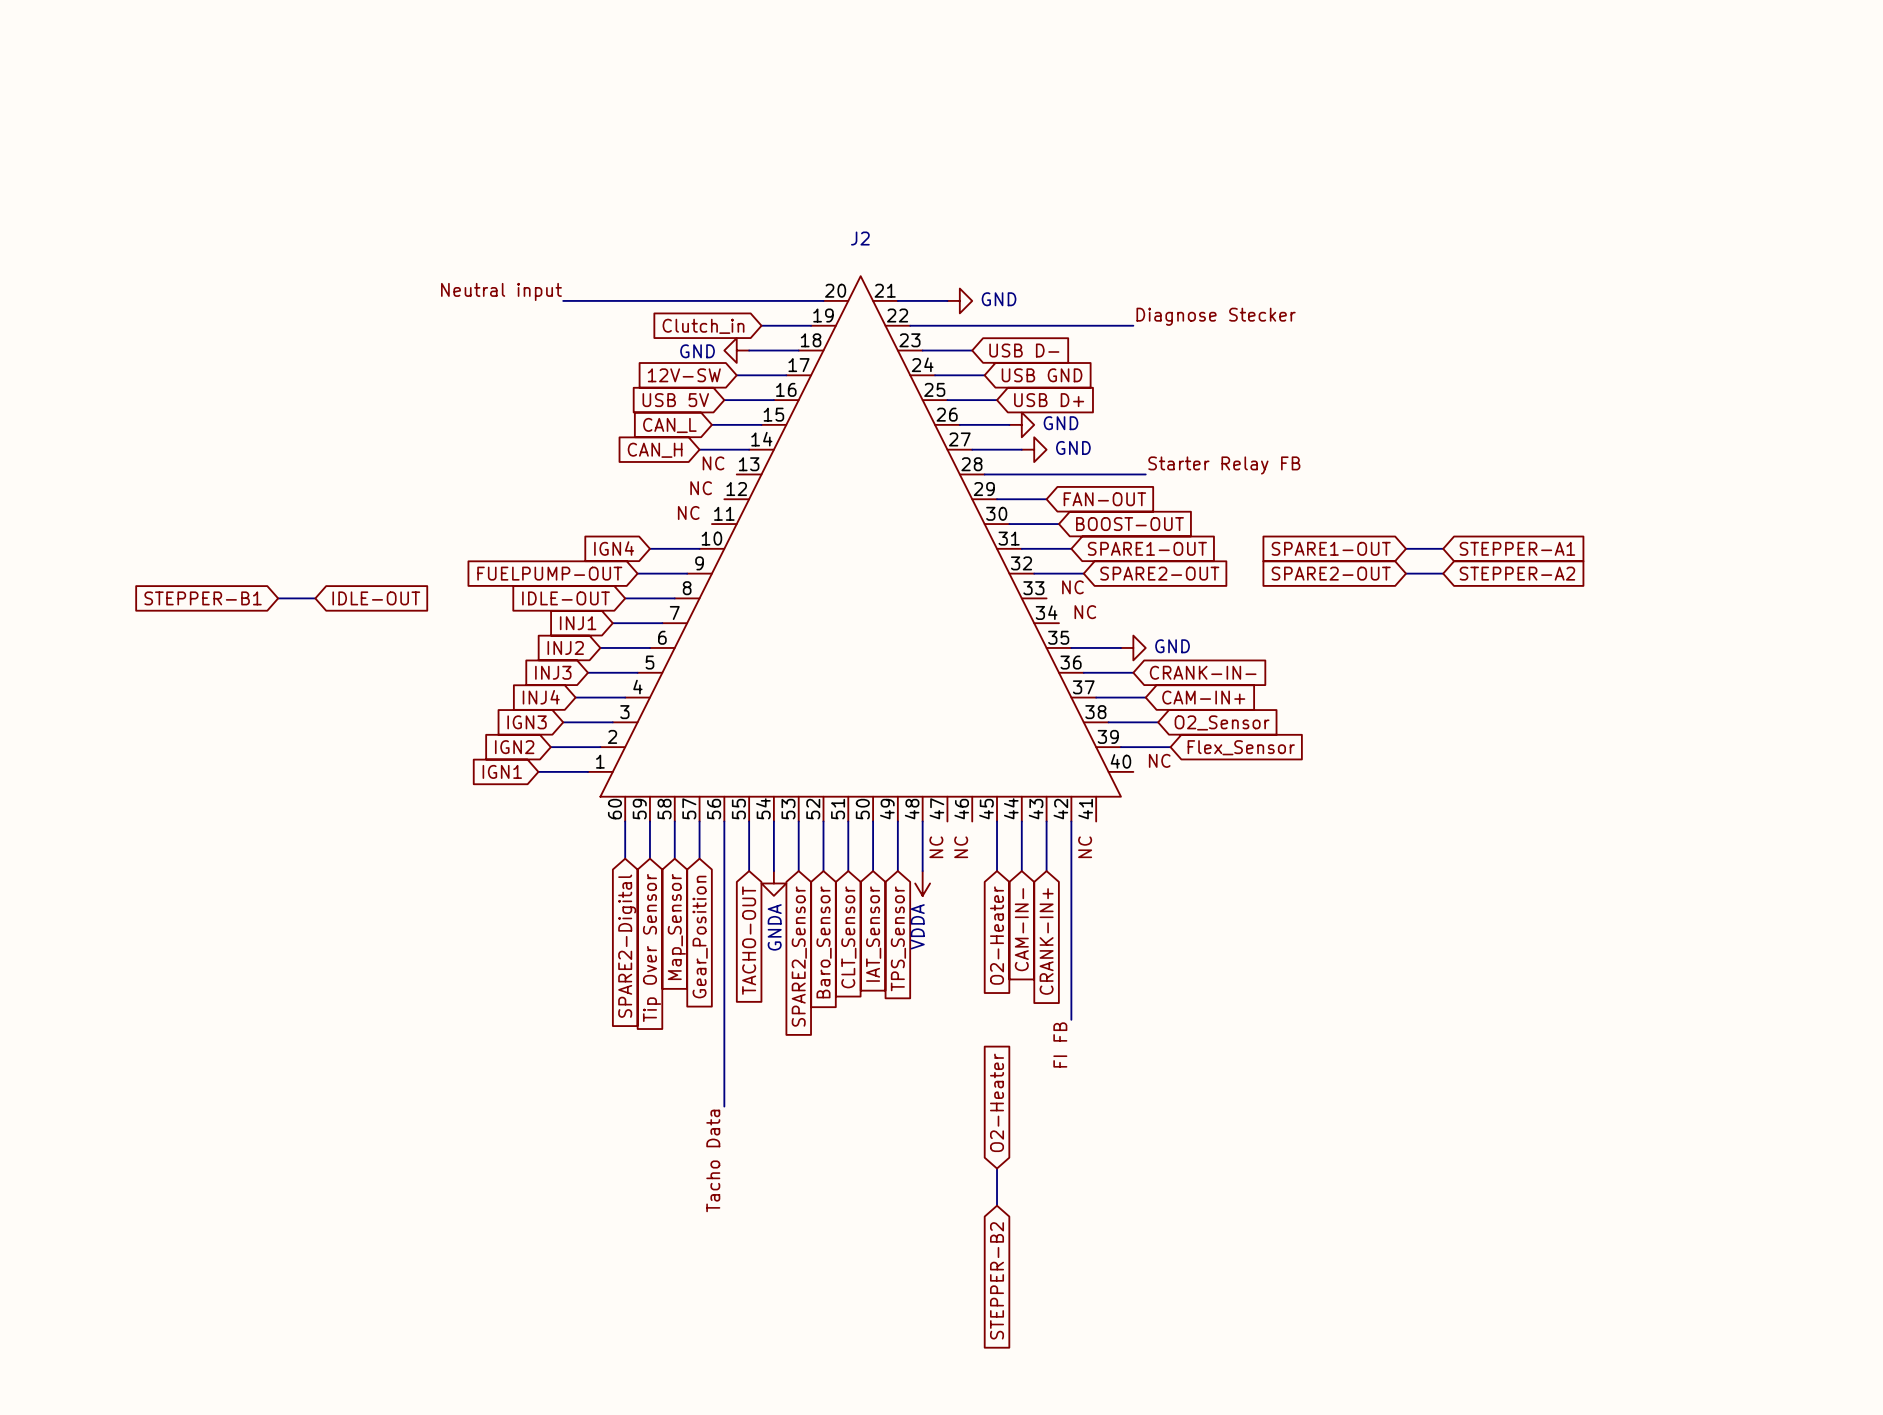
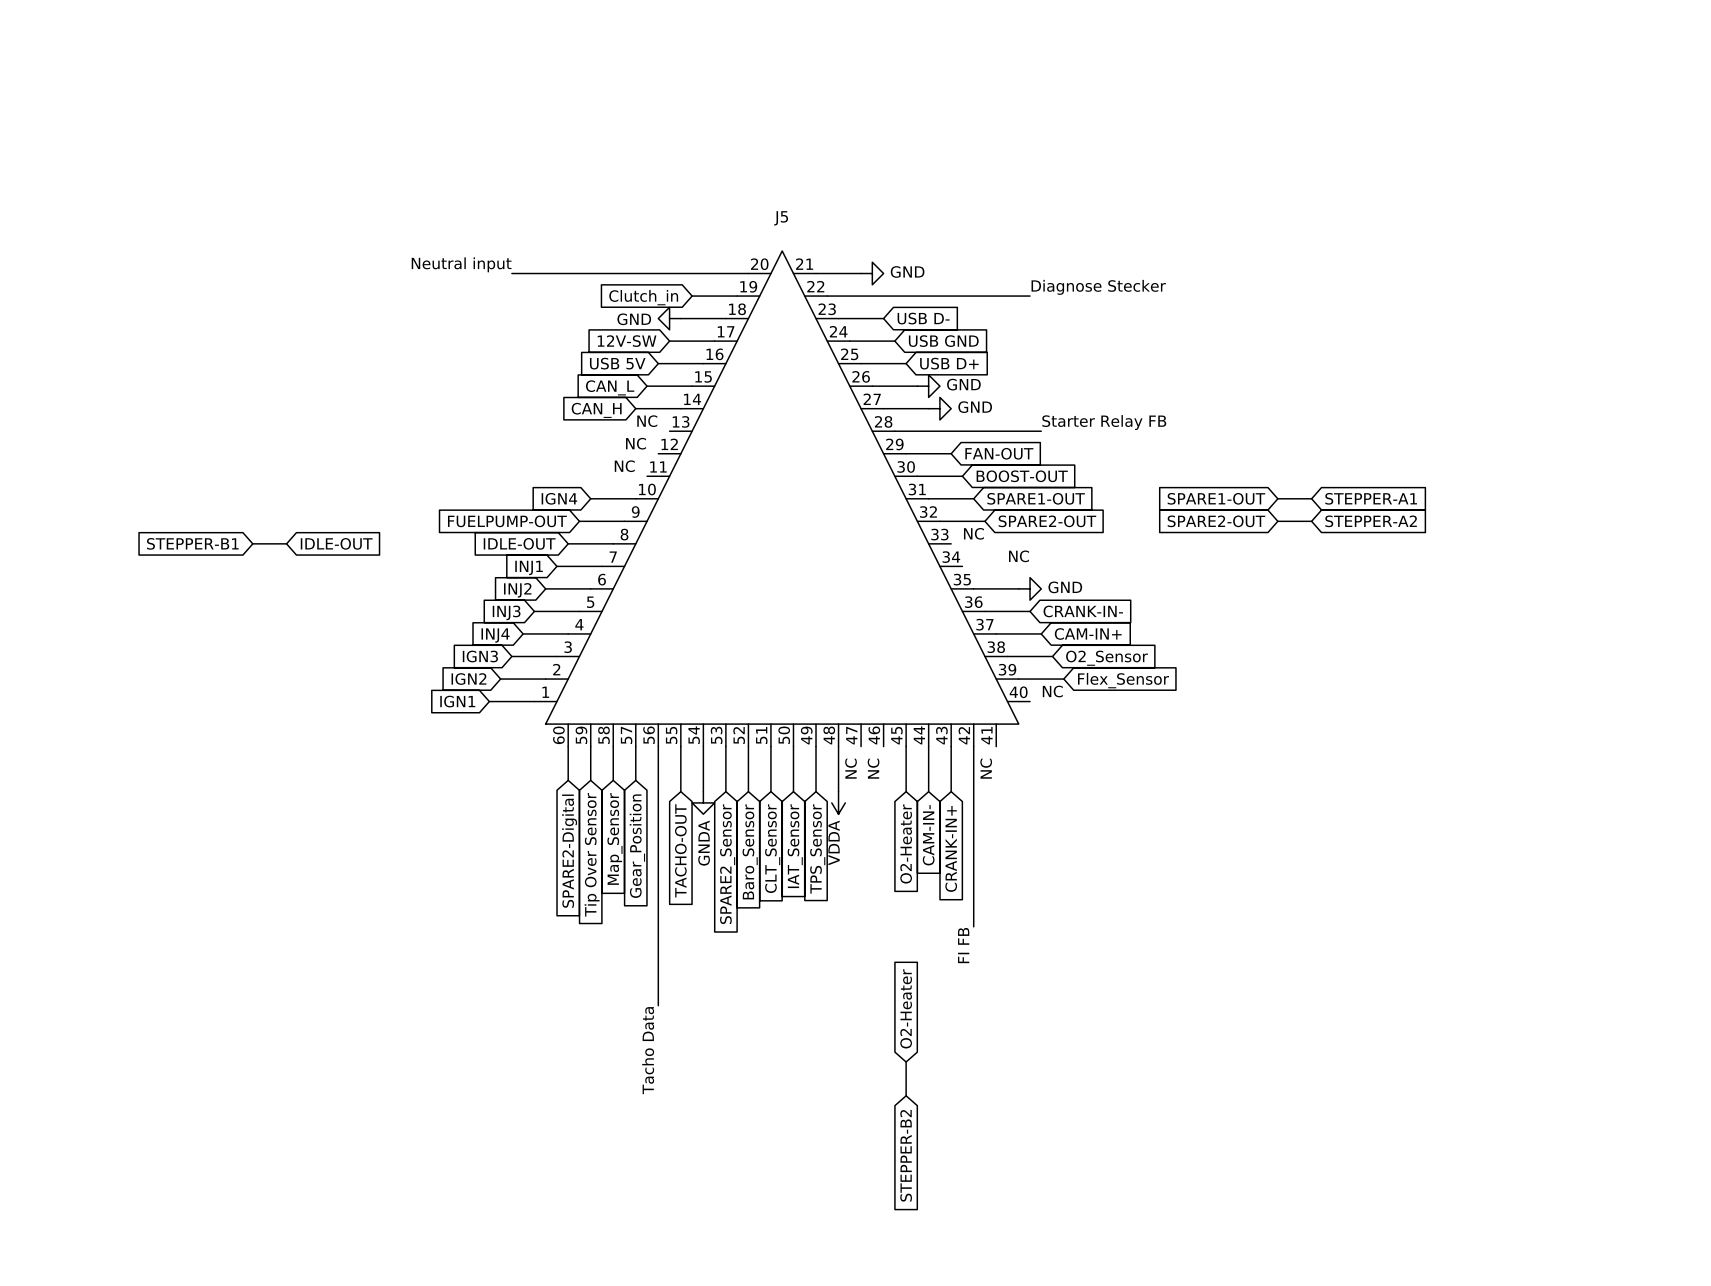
J2 name: J2 (860, 238) -> J5 (781, 218)
label position: NC (1085, 612) -> NC (1019, 556)

